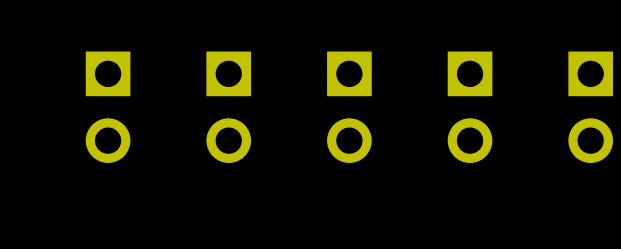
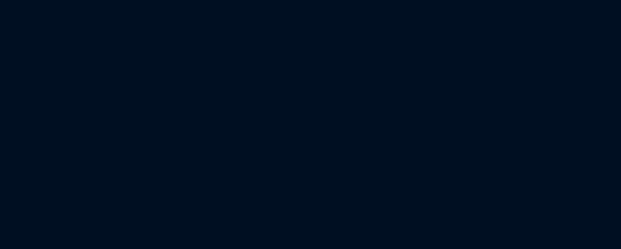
part: (108, 107) -> none
part: (228, 107) -> none
part: (349, 107) -> none
part: (470, 107) -> none
part: (590, 107) -> none

